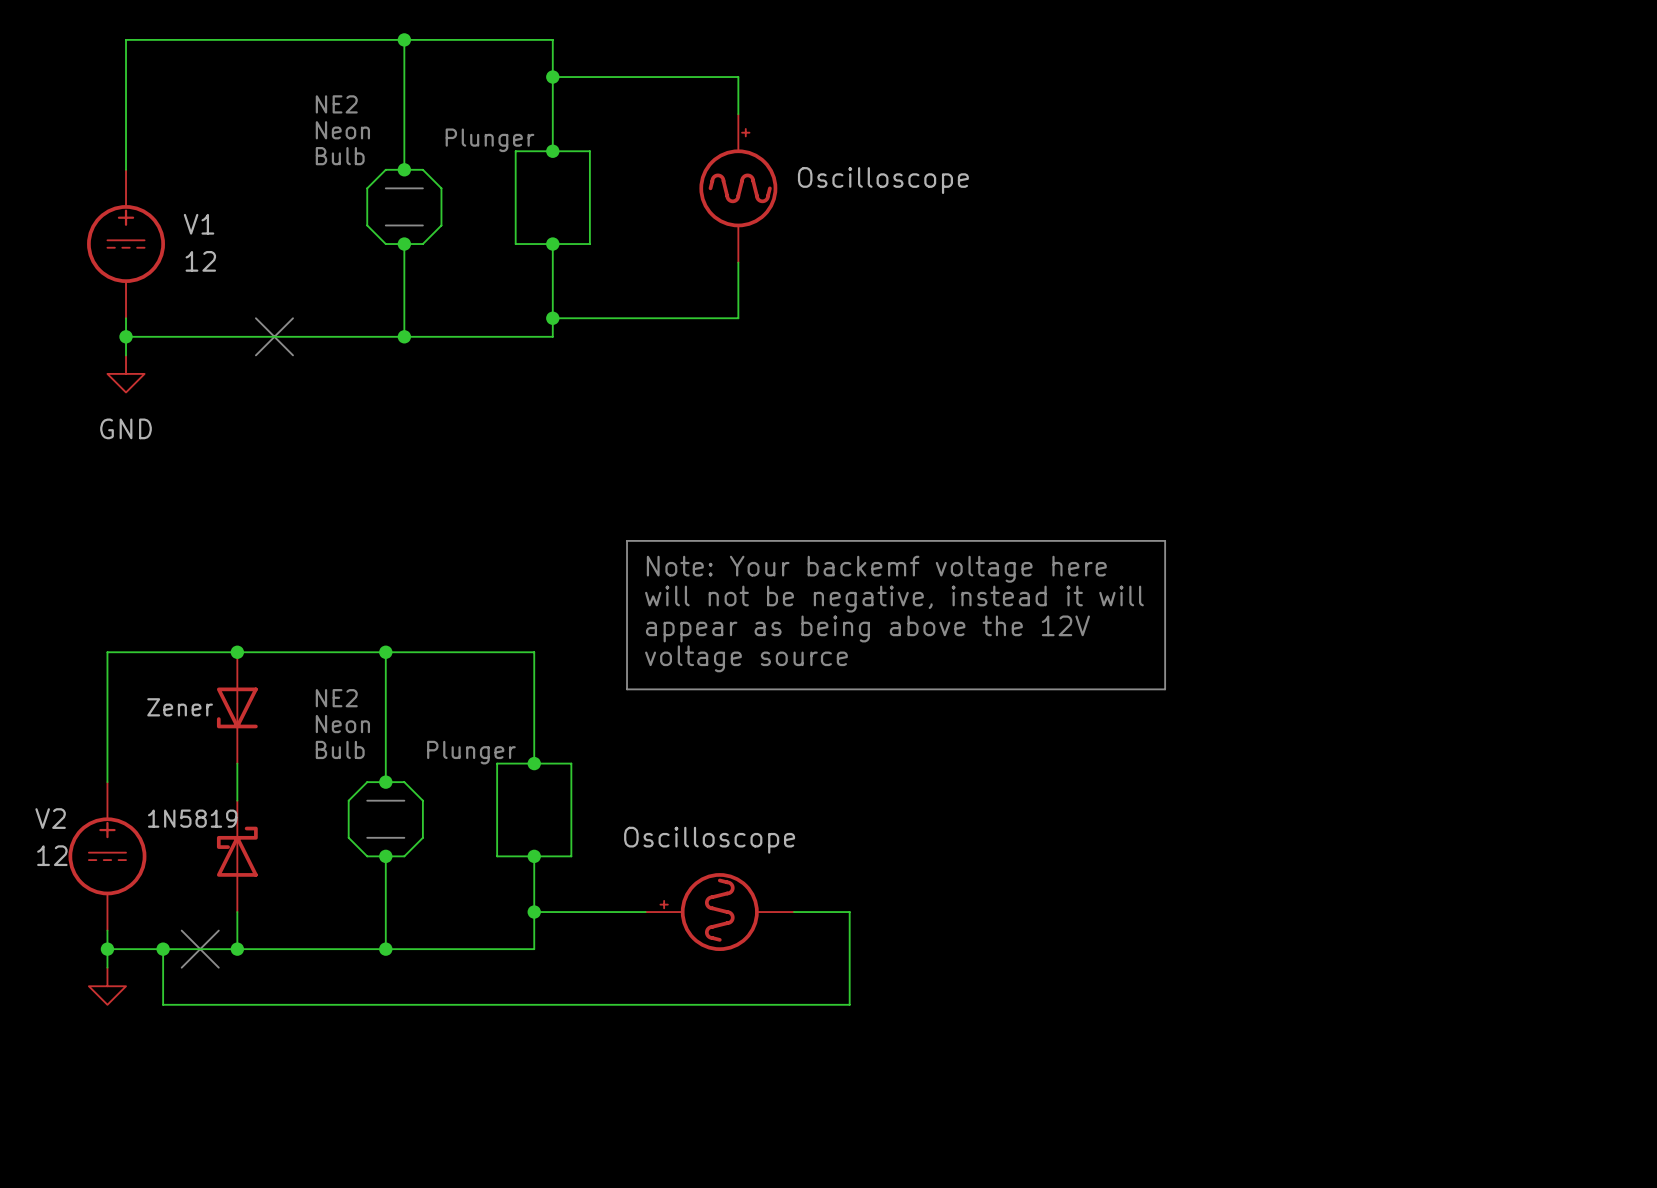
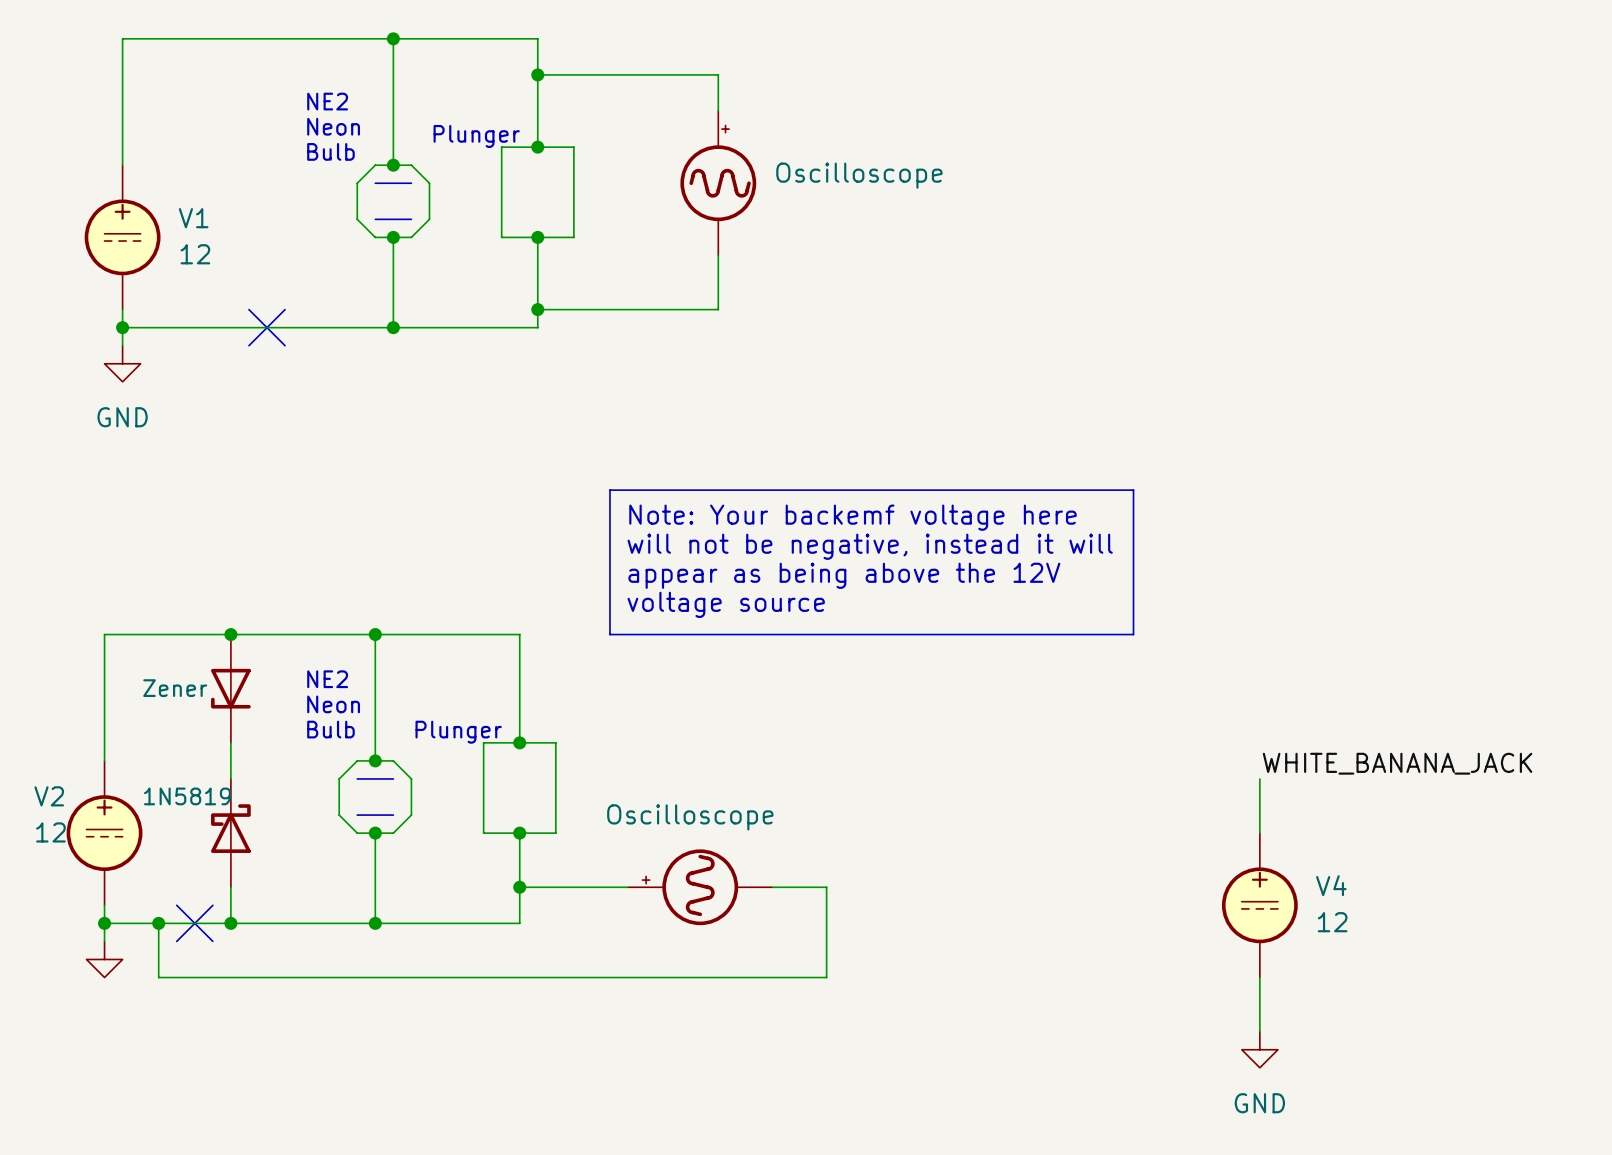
line: (627, 540) (1165, 540) -> (609, 526) (609, 490) (1133, 490) (1133, 526)
text position: Note: Your backemf voltage here (876, 569) -> Note: Your backemf voltage here (852, 517)
text position: will not be negative, instead it will (894, 599) -> will not be negative, instead it will (870, 546)
text position: appear as being above the 12V (867, 628) -> appear as being above the 12V (844, 575)
line: (627, 652) (627, 689) (1165, 689) (1165, 652) -> (609, 634) (1133, 634)
text position: voltage source (746, 658) -> voltage source (726, 604)
label: none -> WHITE_BANANA_JACK (1397, 763)
wire: none -> (1259, 778) (1259, 833)
V4: none -> 12 (1259, 905)
wire: none -> (1259, 977) (1259, 1031)
power symbol: none -> GND (1259, 1049)

